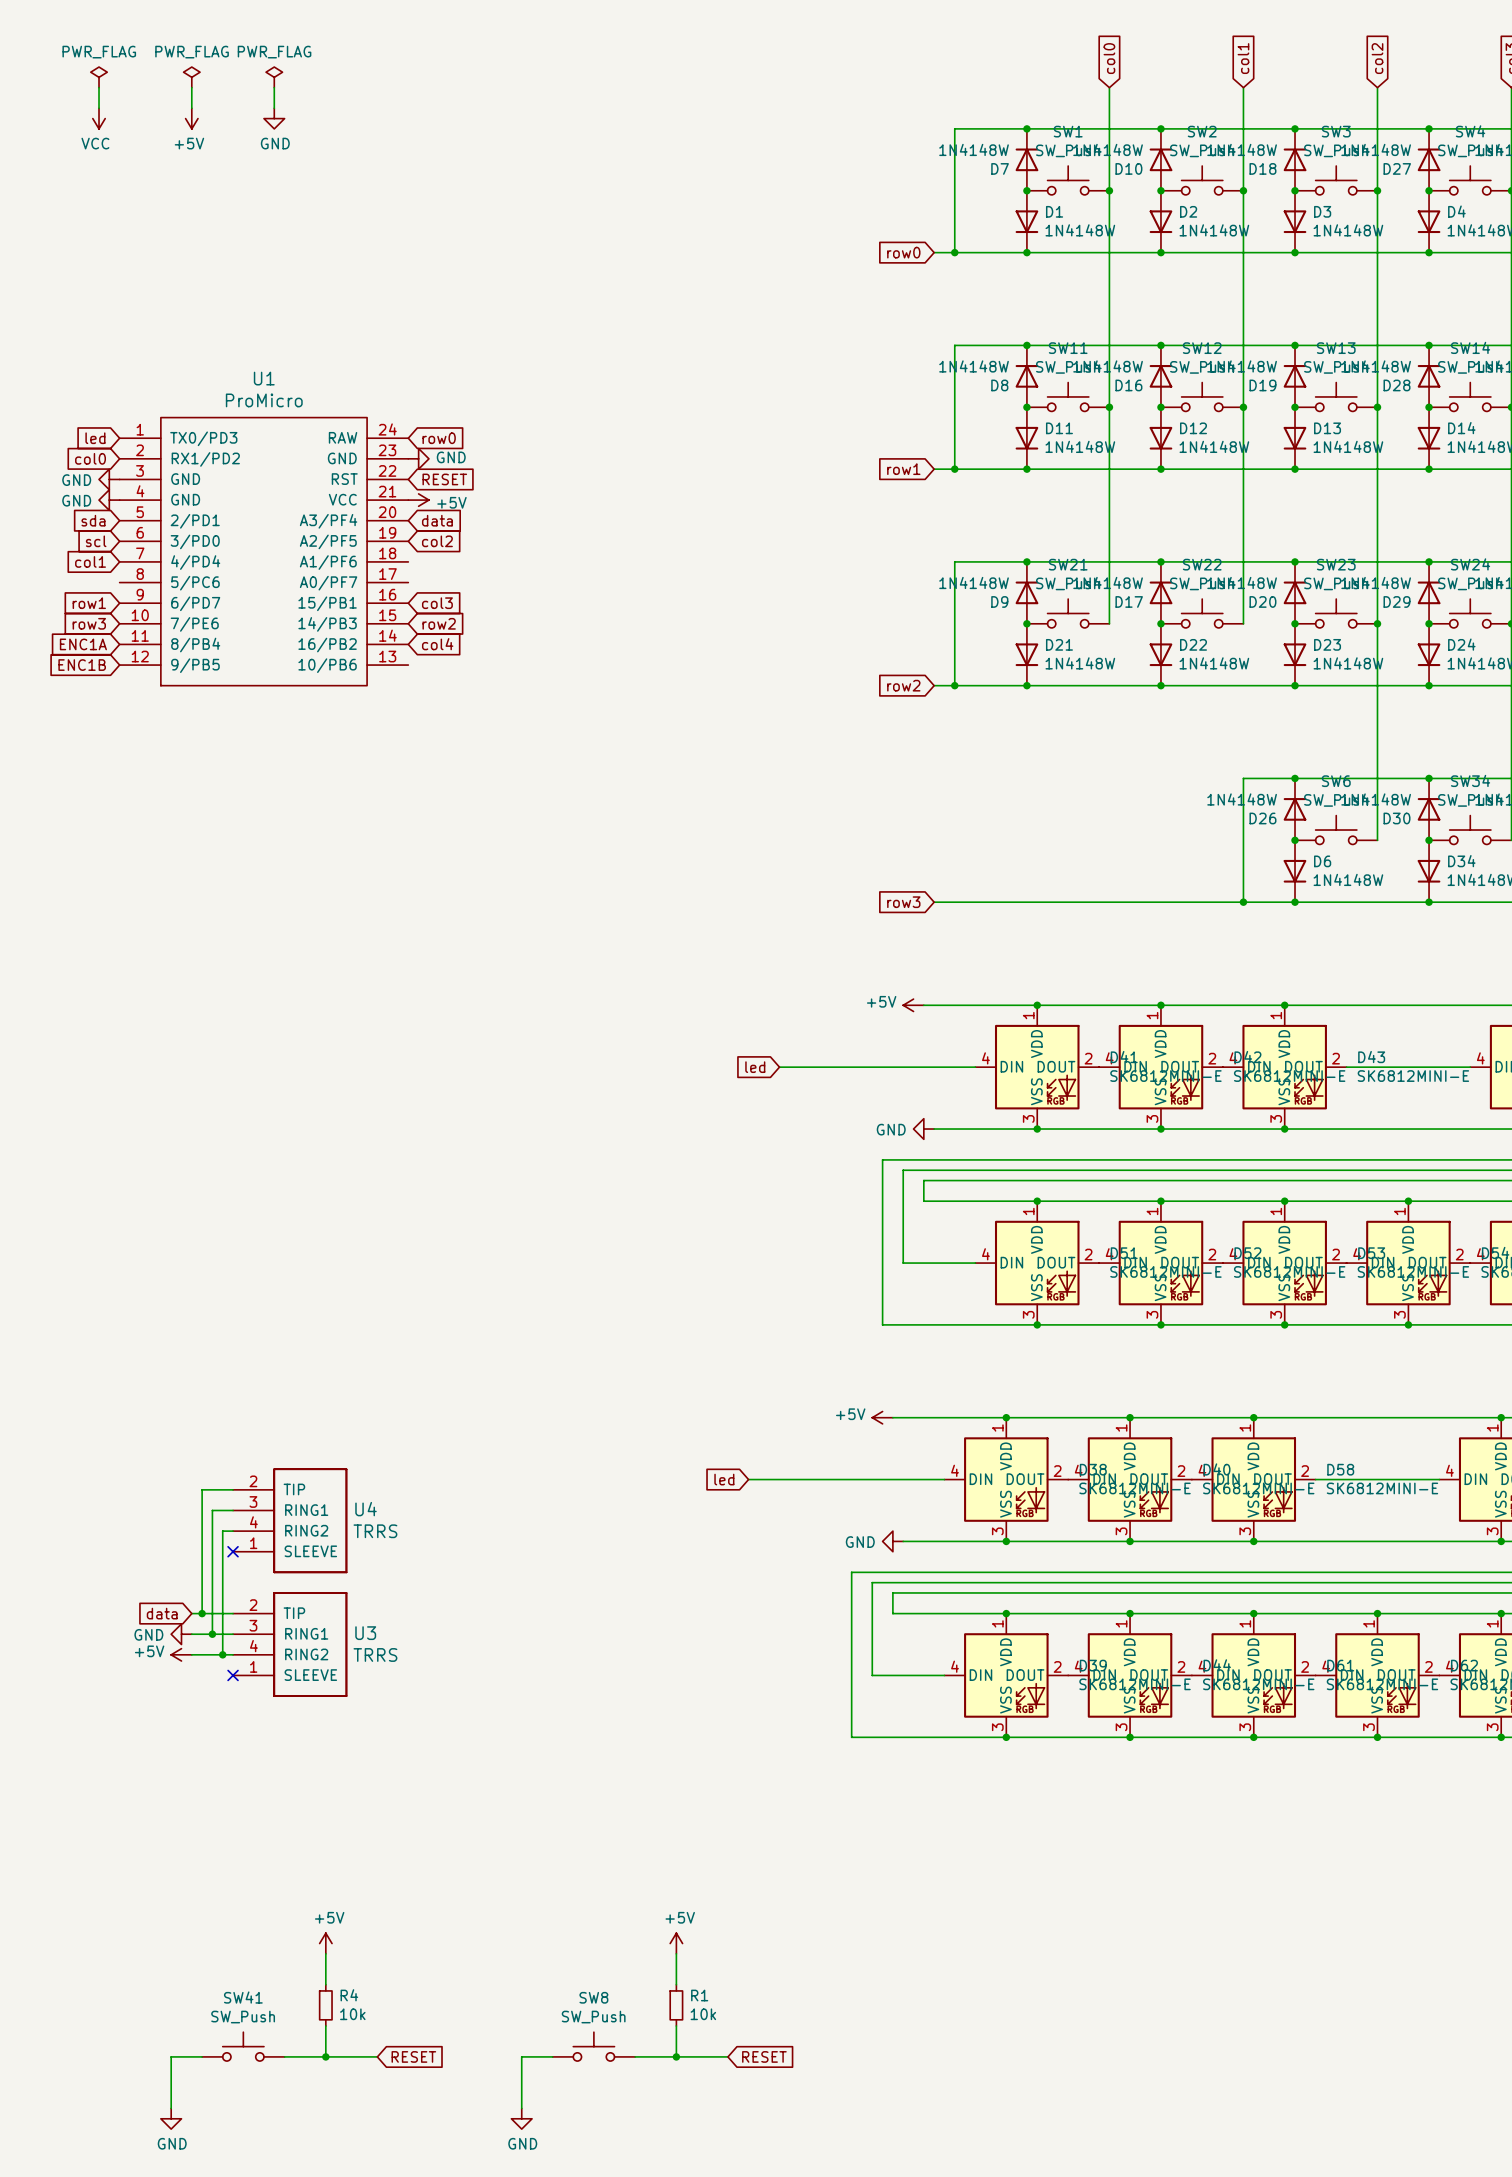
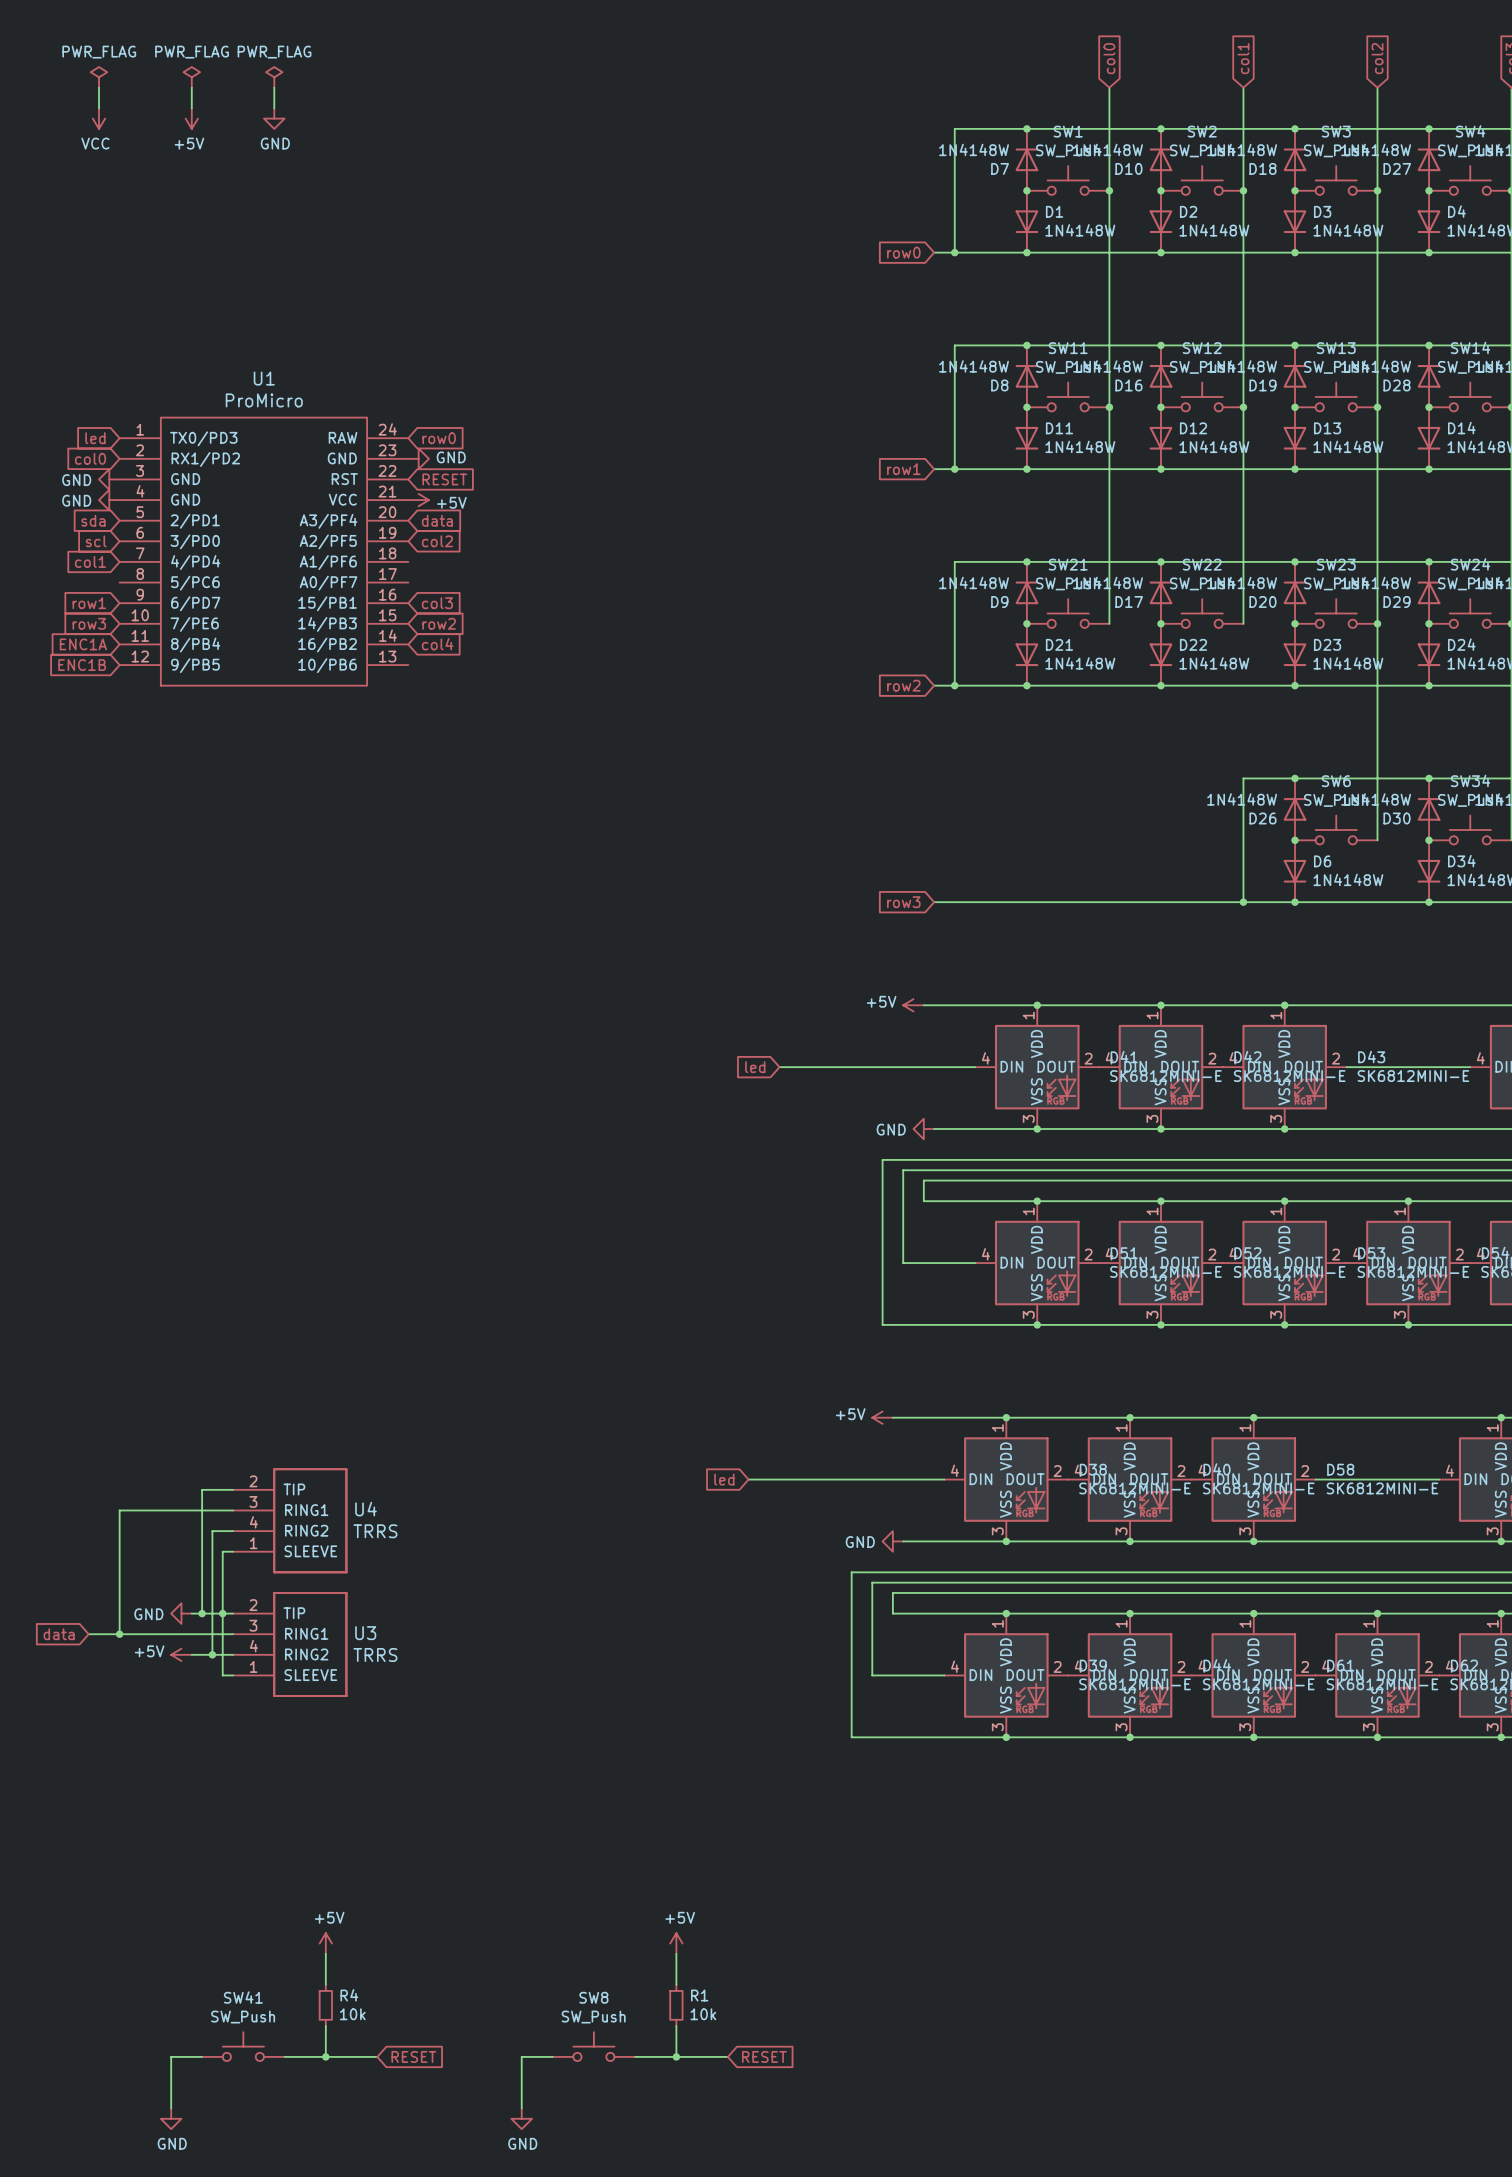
wire: (212, 1510) (212, 1531) -> (212, 1510) (119, 1510) (119, 1634)
wire: (222, 1531) (222, 1551) -> (222, 1531) (212, 1531)
wire: none -> (222, 1551) (233, 1551)
no-connect mark: (233, 1551) -> none
global label position: data (162, 1613) -> data (59, 1634)
junction: none -> (222, 1613)
wire: none -> (88, 1634) (191, 1634)
junction: none -> (119, 1634)
power symbol position: GND (181, 1634) -> GND (181, 1613)
wire: none -> (212, 1634) (212, 1654)
junction: (212, 1634) -> none
junction: none -> (212, 1654)
wire: none -> (222, 1654) (222, 1675) (233, 1675)
junction: (222, 1654) -> none
no-connect mark: (233, 1675) -> none

